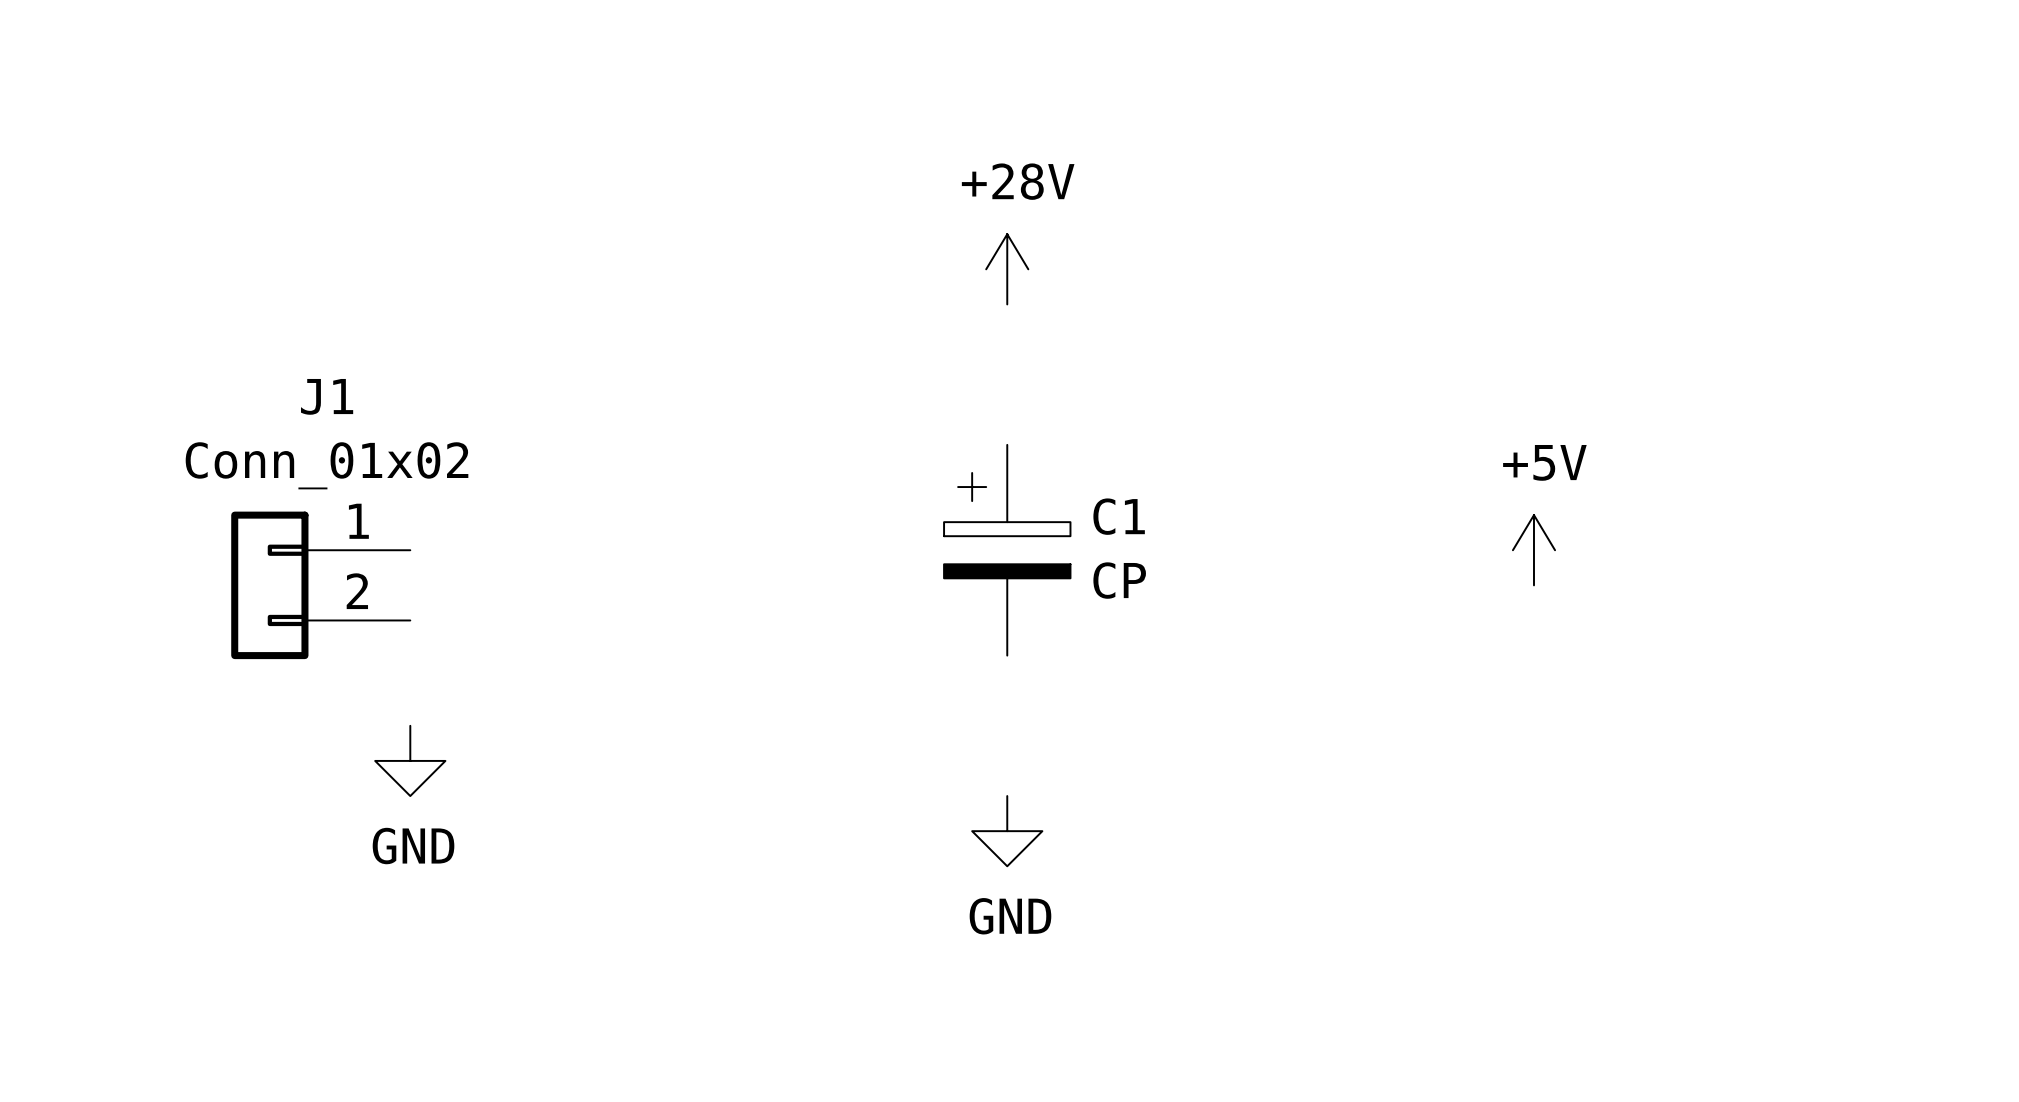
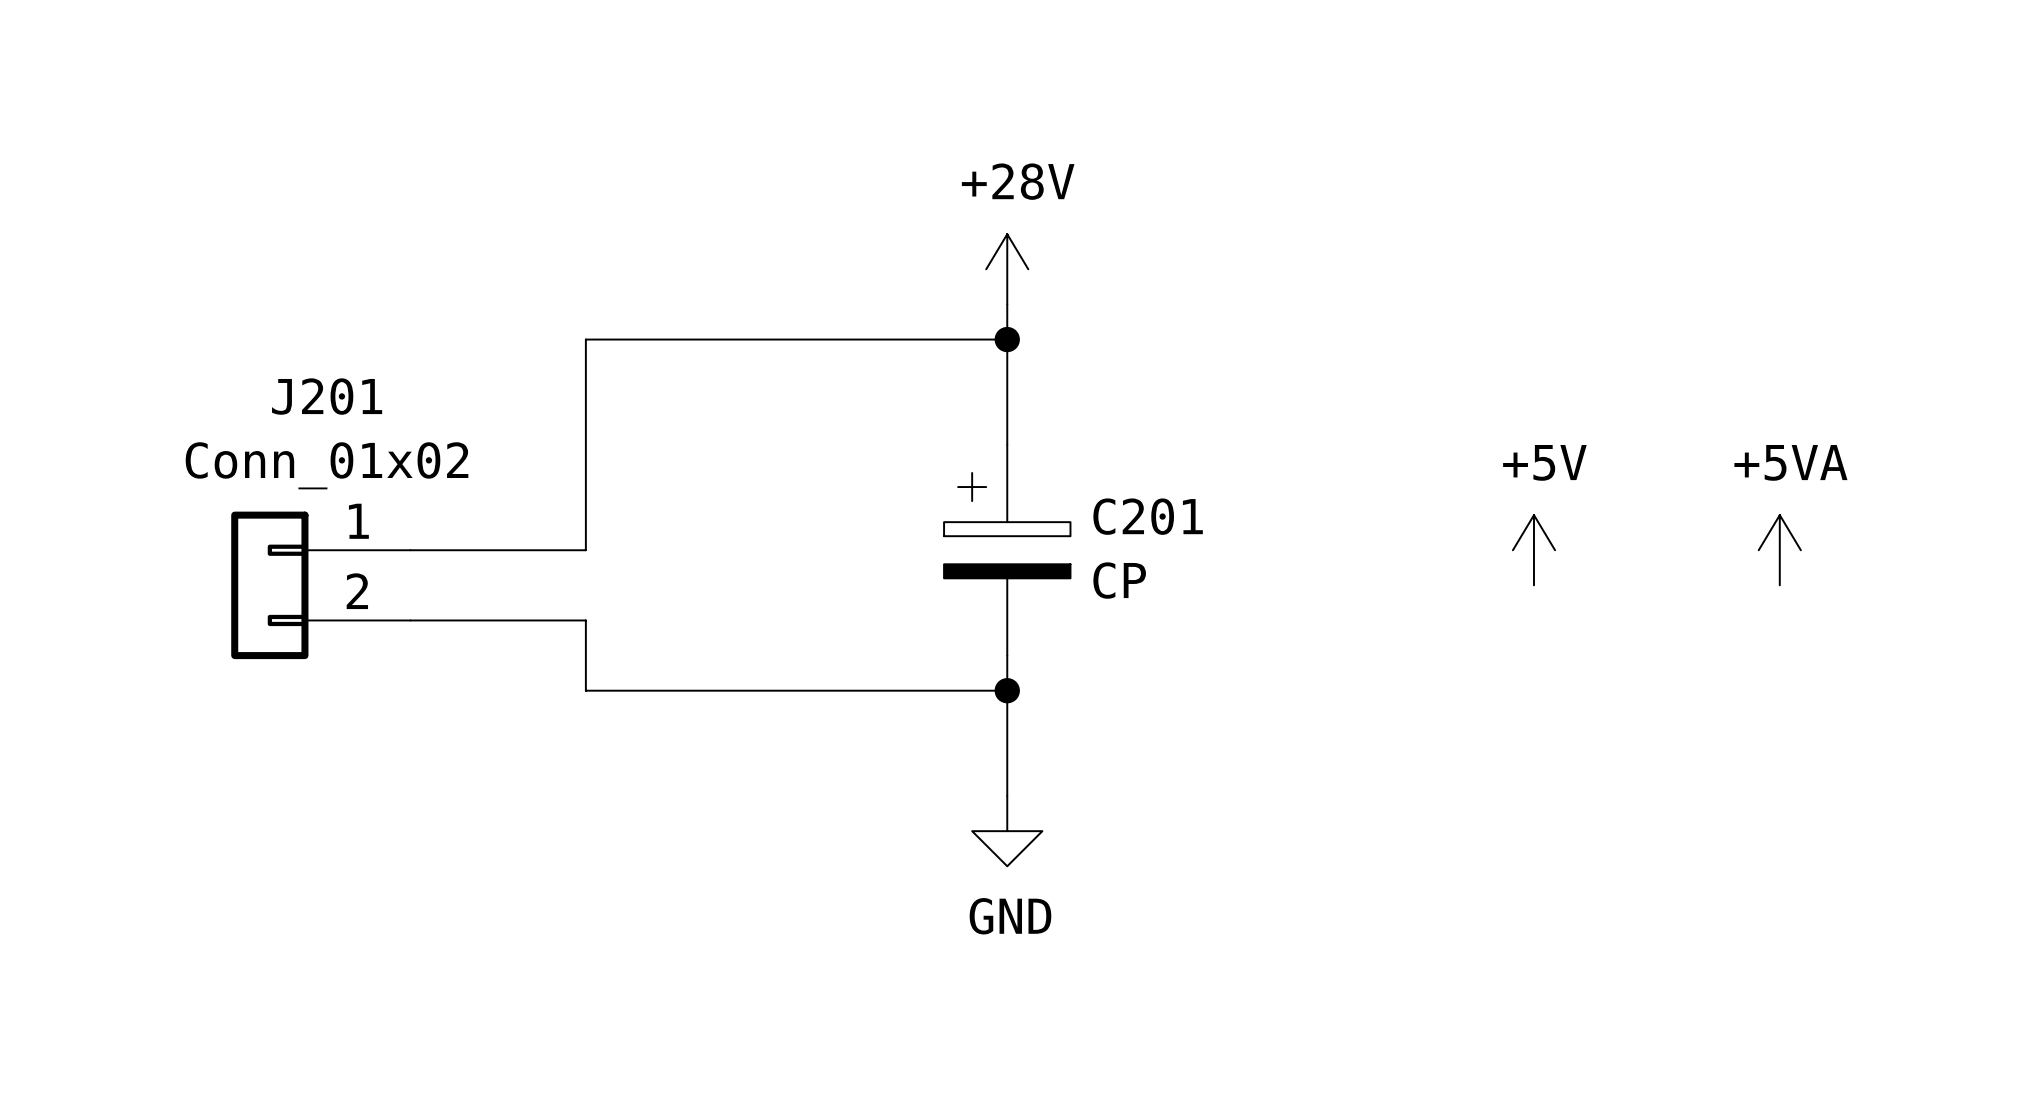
wire: none -> (1007, 304) (1007, 444)
wire: none -> (1007, 339) (585, 339) (585, 550) (410, 550)
junction: none -> (1007, 339)
J1 name: J1 (327, 396) -> J201 (327, 396)
C1 name: C1 (1119, 516) -> C201 (1148, 516)
power symbol: none -> +5VA (1779, 550)
wire: none -> (410, 620) (585, 620) (585, 690) (1007, 690)
wire: none -> (1007, 655) (1007, 796)
junction: none -> (1007, 690)
power symbol: GND (410, 760) -> none

